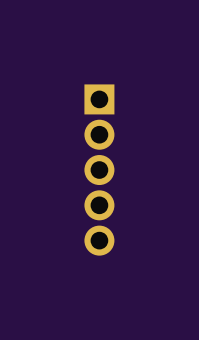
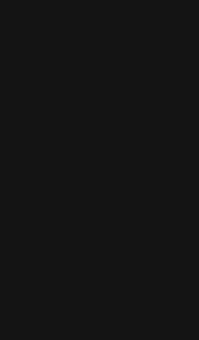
part: (99, 170) -> none

